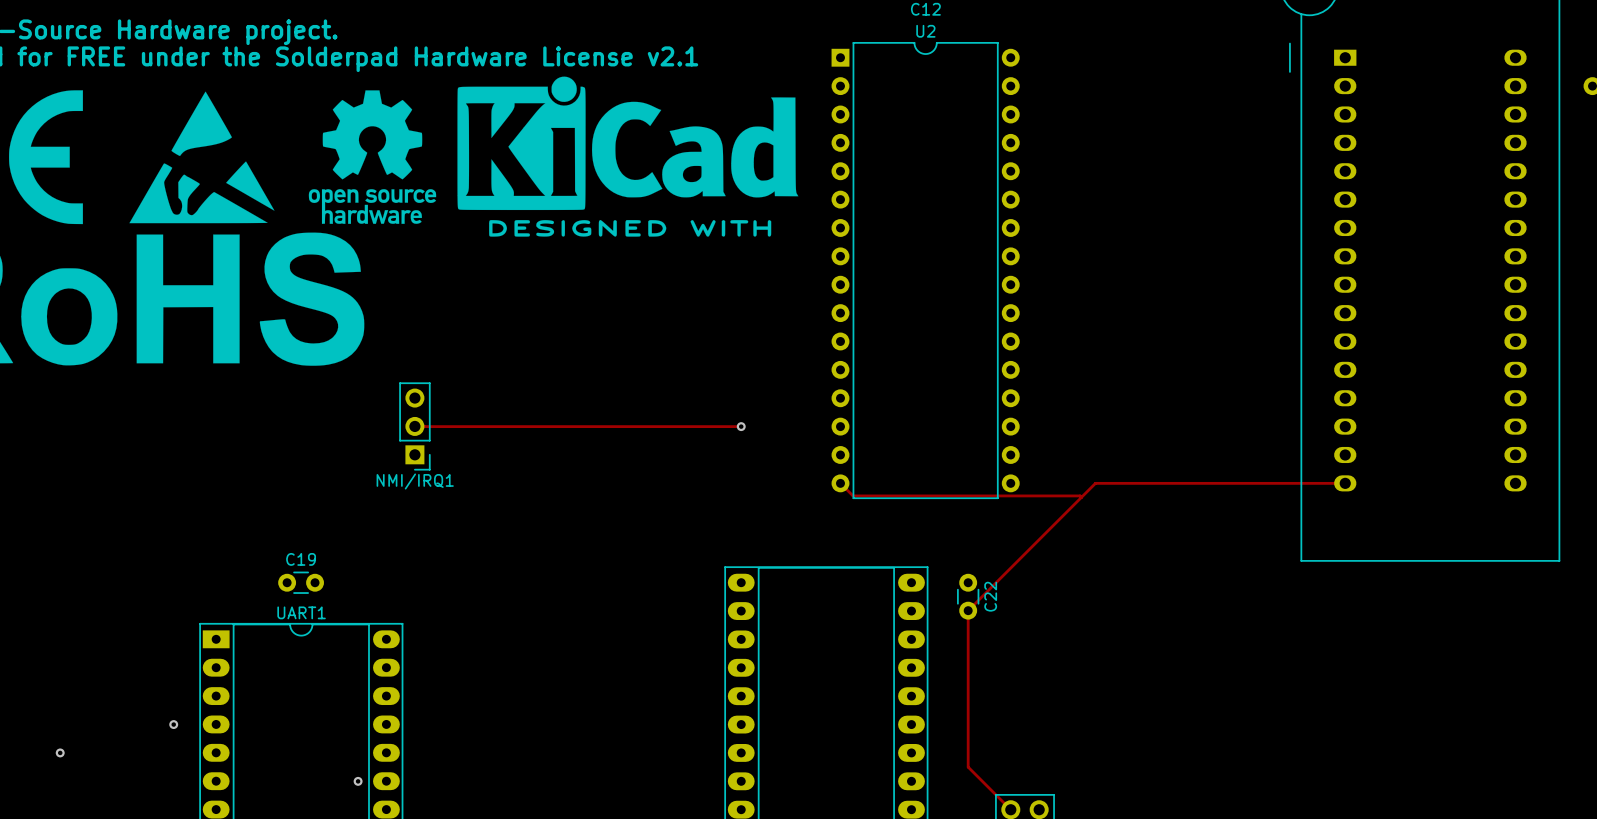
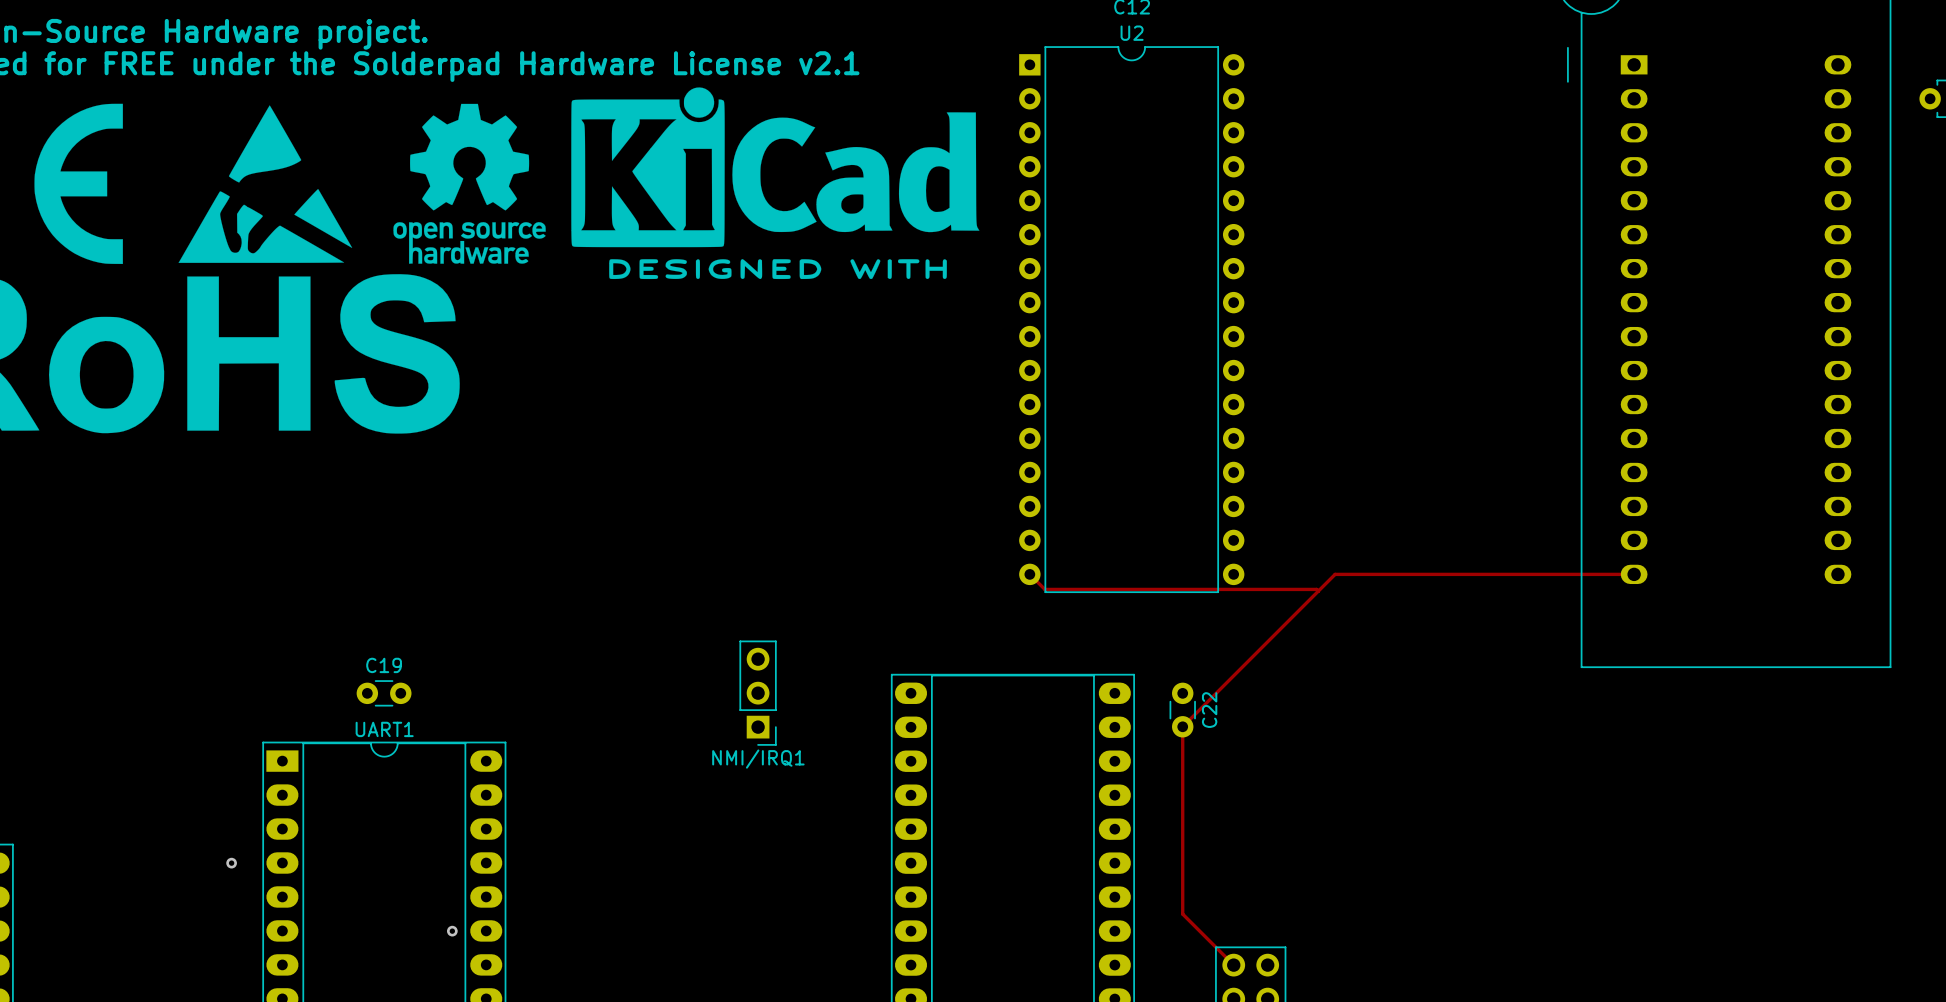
top track: (414, 426) (741, 426) -> none
NMI/IRQ1 position: (414, 426) -> (758, 693)
via: (741, 426) -> none
via: (60, 752) -> none

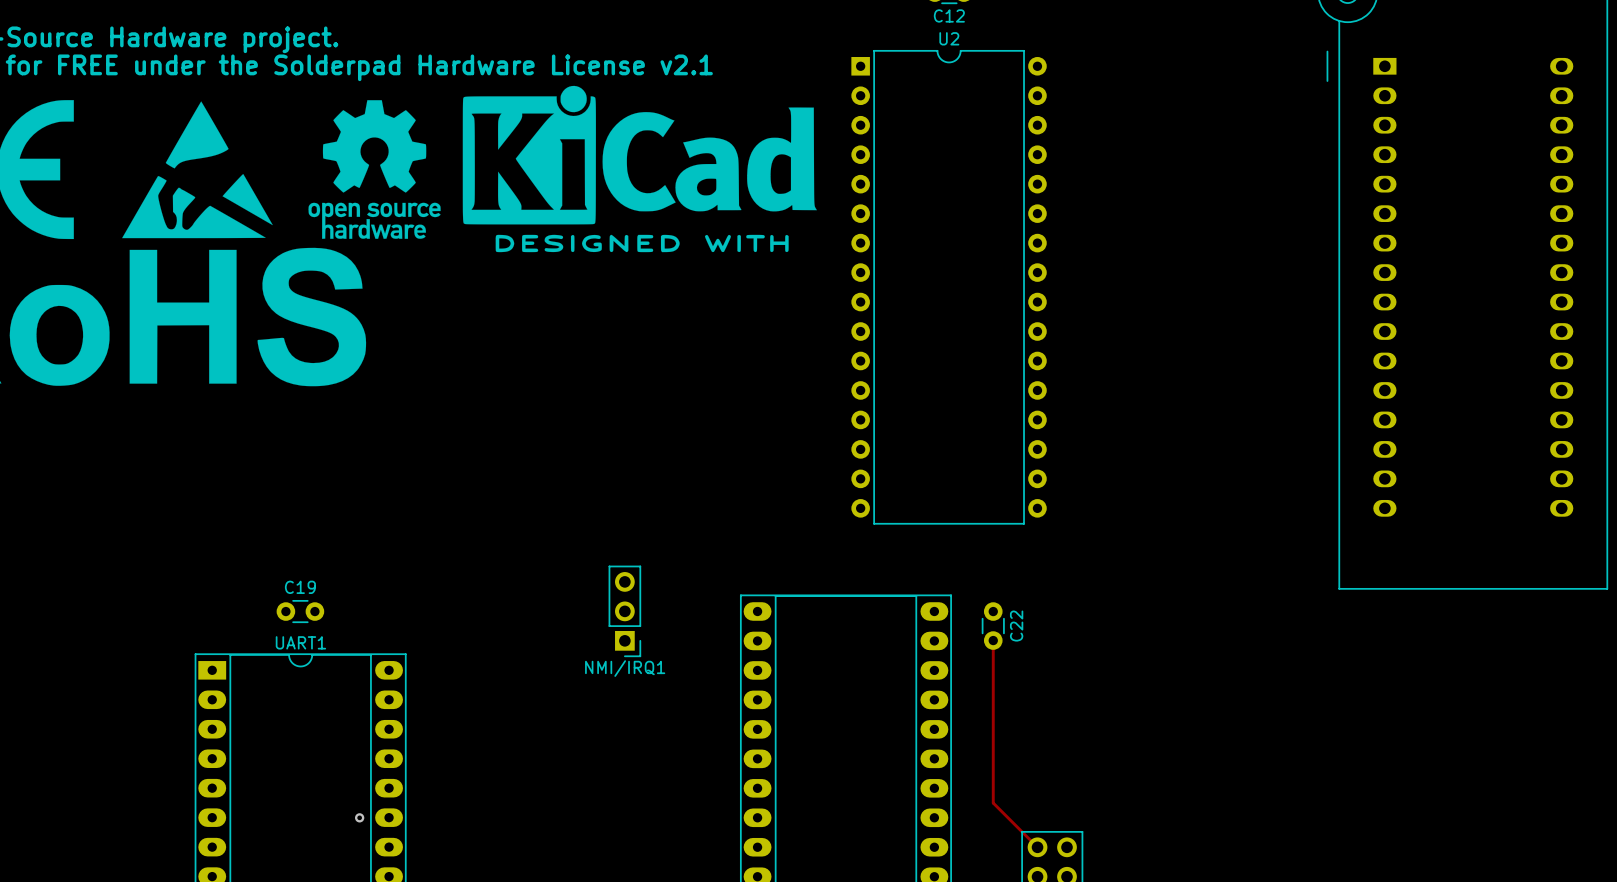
top track: (1029, 574) (1044, 589) (1316, 589) (1318, 591) -> none
top track: (1634, 574) (1335, 574) (1182, 726) -> none
via: (231, 863) -> none

